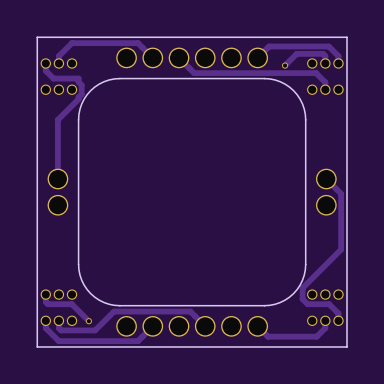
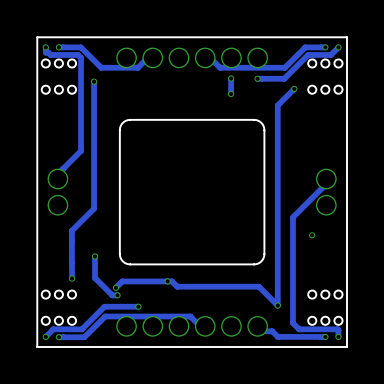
track: none -> (45, 47) (45, 52) (50, 54) (78, 54) (81, 57) (81, 150) (52, 179)
via: none -> (45, 47)
track: none -> (58, 47) (80, 47) (101, 67) (138, 67) (152, 52)
via: none -> (58, 47)
track: none -> (325, 47) (305, 47) (284, 67) (220, 67) (205, 52)
via: none -> (325, 47)
track: none -> (338, 47) (330, 54) (308, 54) (284, 78) (257, 78)
via: none -> (338, 47)
track: (152, 57) (138, 43) (71, 43) (58, 56) (58, 63) -> none
track: (179, 57) (194, 73) (316, 73) (325, 82) (325, 89) -> none
track: (257, 57) (269, 46) (328, 46) (338, 56) (338, 63) -> none
part footprint: [40, 58, 78, 95] -> [41, 59, 77, 94]
part footprint: [307, 58, 344, 95] -> [308, 59, 343, 94]
track: (45, 63) (45, 70) (53, 78) (78, 78) (81, 85) (81, 94) (78, 99) (57, 119) (57, 179) -> none
track: (325, 63) (325, 56) (323, 53) (296, 53) (285, 65) -> none
via: (285, 65) -> none
track: none -> (231, 78) (231, 93)
via: none -> (231, 78)
via: none -> (257, 78)
board edge: (264, 78) (114, 78) (99, 84) (87, 94) (79, 109) (78, 119) (78, 264) (81, 280) (94, 297) (104, 302) (119, 305) (264, 305) (285, 300) (297, 289) (302, 280) (305, 264) (305, 114) (300, 99) (293, 90) (280, 81) (264, 78) -> none
track: none -> (94, 81) (94, 208) (71, 230) (72, 278)
via: none -> (94, 81)
track: none -> (294, 88) (277, 105) (277, 305) (258, 286) (177, 286) (172, 281) (122, 281) (115, 287)
via: none -> (294, 88)
via: none -> (231, 93)
board edge: none -> (254, 119) (130, 119) (122, 122) (119, 130) (119, 254) (122, 261) (130, 264) (254, 264) (261, 261) (264, 254) (264, 130) (261, 122) (254, 119)
track: (326, 179) (341, 193) (341, 249) (302, 288) (302, 299) (307, 304) (329, 304) (338, 313) (338, 320) -> none
track: none -> (331, 179) (292, 217) (292, 323) (299, 329) (337, 329) (338, 336)
via: none -> (312, 235)
track: none -> (94, 256) (94, 277) (112, 295) (117, 295)
via: none -> (94, 256)
via: none -> (72, 278)
via: none -> (167, 281)
via: none -> (115, 287)
part footprint: [40, 289, 78, 326] -> [41, 290, 77, 325]
part footprint: [307, 289, 344, 326] -> [308, 290, 343, 325]
track: (45, 294) (45, 301) (48, 304) (71, 304) (88, 321) -> none
via: none -> (117, 295)
via: none -> (277, 305)
track: none -> (138, 306) (104, 306) (81, 329) (53, 329) (45, 336)
via: none -> (138, 306)
track: (45, 320) (45, 328) (58, 341) (138, 341) (152, 326) -> none
track: (58, 320) (58, 328) (61, 330) (95, 330) (114, 311) (190, 311) (205, 326) -> none
track: (325, 320) (325, 328) (316, 336) (268, 336) (257, 326) -> none
via: (88, 321) -> none
track: none -> (205, 331) (190, 316) (105, 316) (84, 337) (58, 337)
track: none -> (257, 331) (272, 331) (277, 336) (325, 336)
via: none -> (45, 336)
via: none -> (325, 336)
via: none -> (338, 336)
via: none -> (58, 337)

